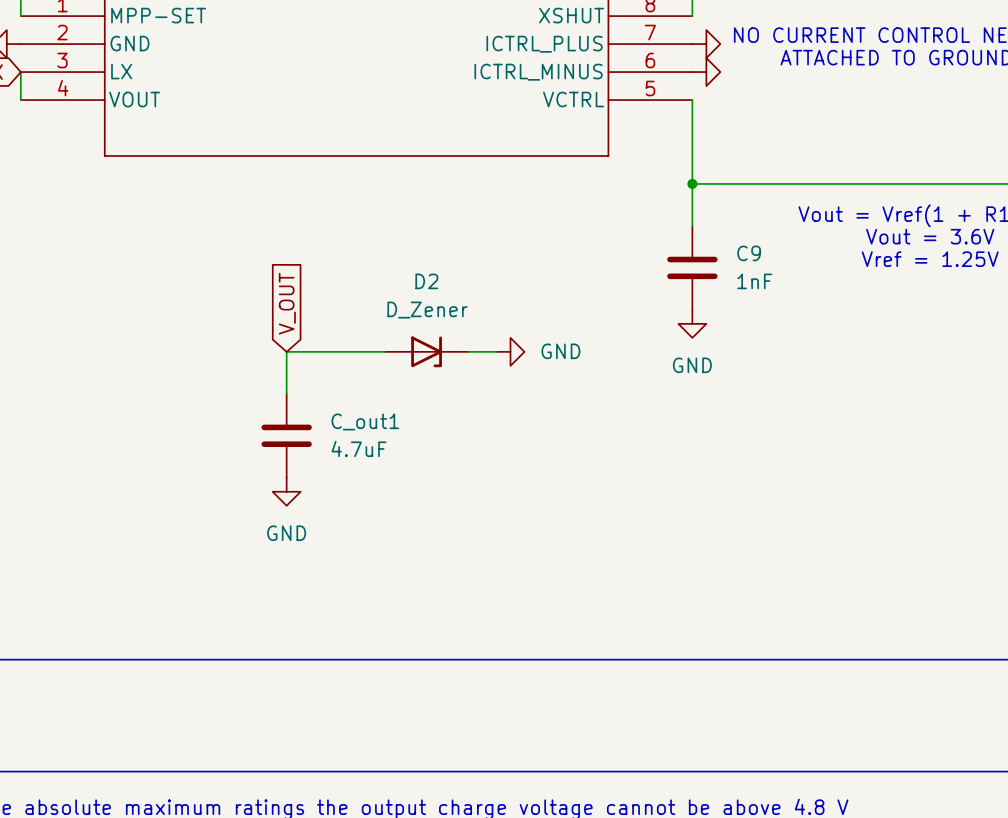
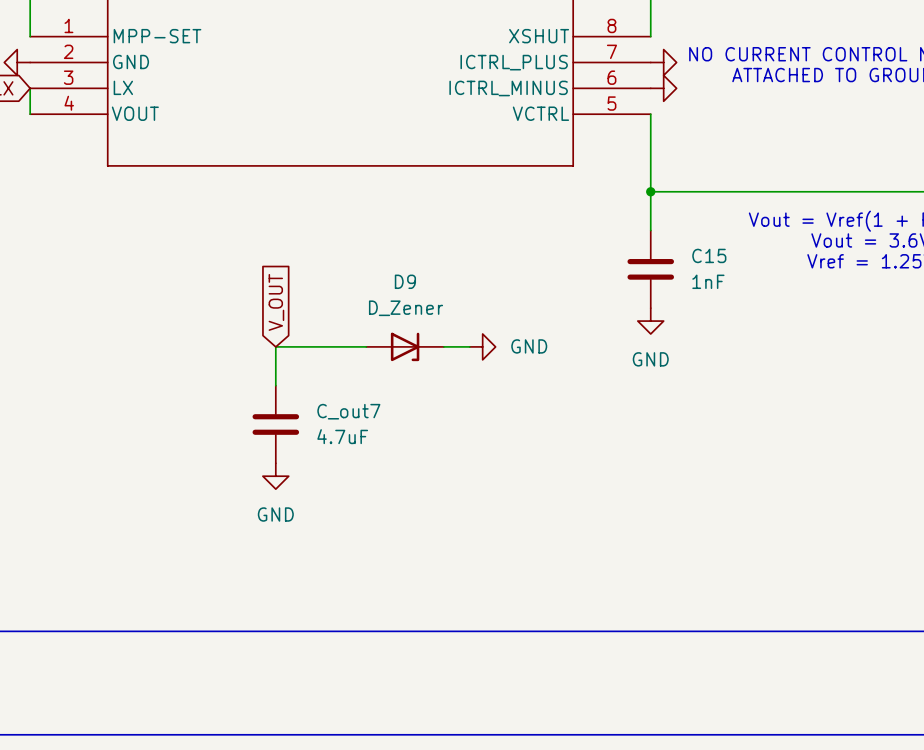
C9 name: C9 (749, 253) -> C15 (709, 255)
D2 name: D2 (426, 281) -> D9 (405, 281)
C_out1 name: C_out1 (365, 421) -> C_out7 (348, 411)

